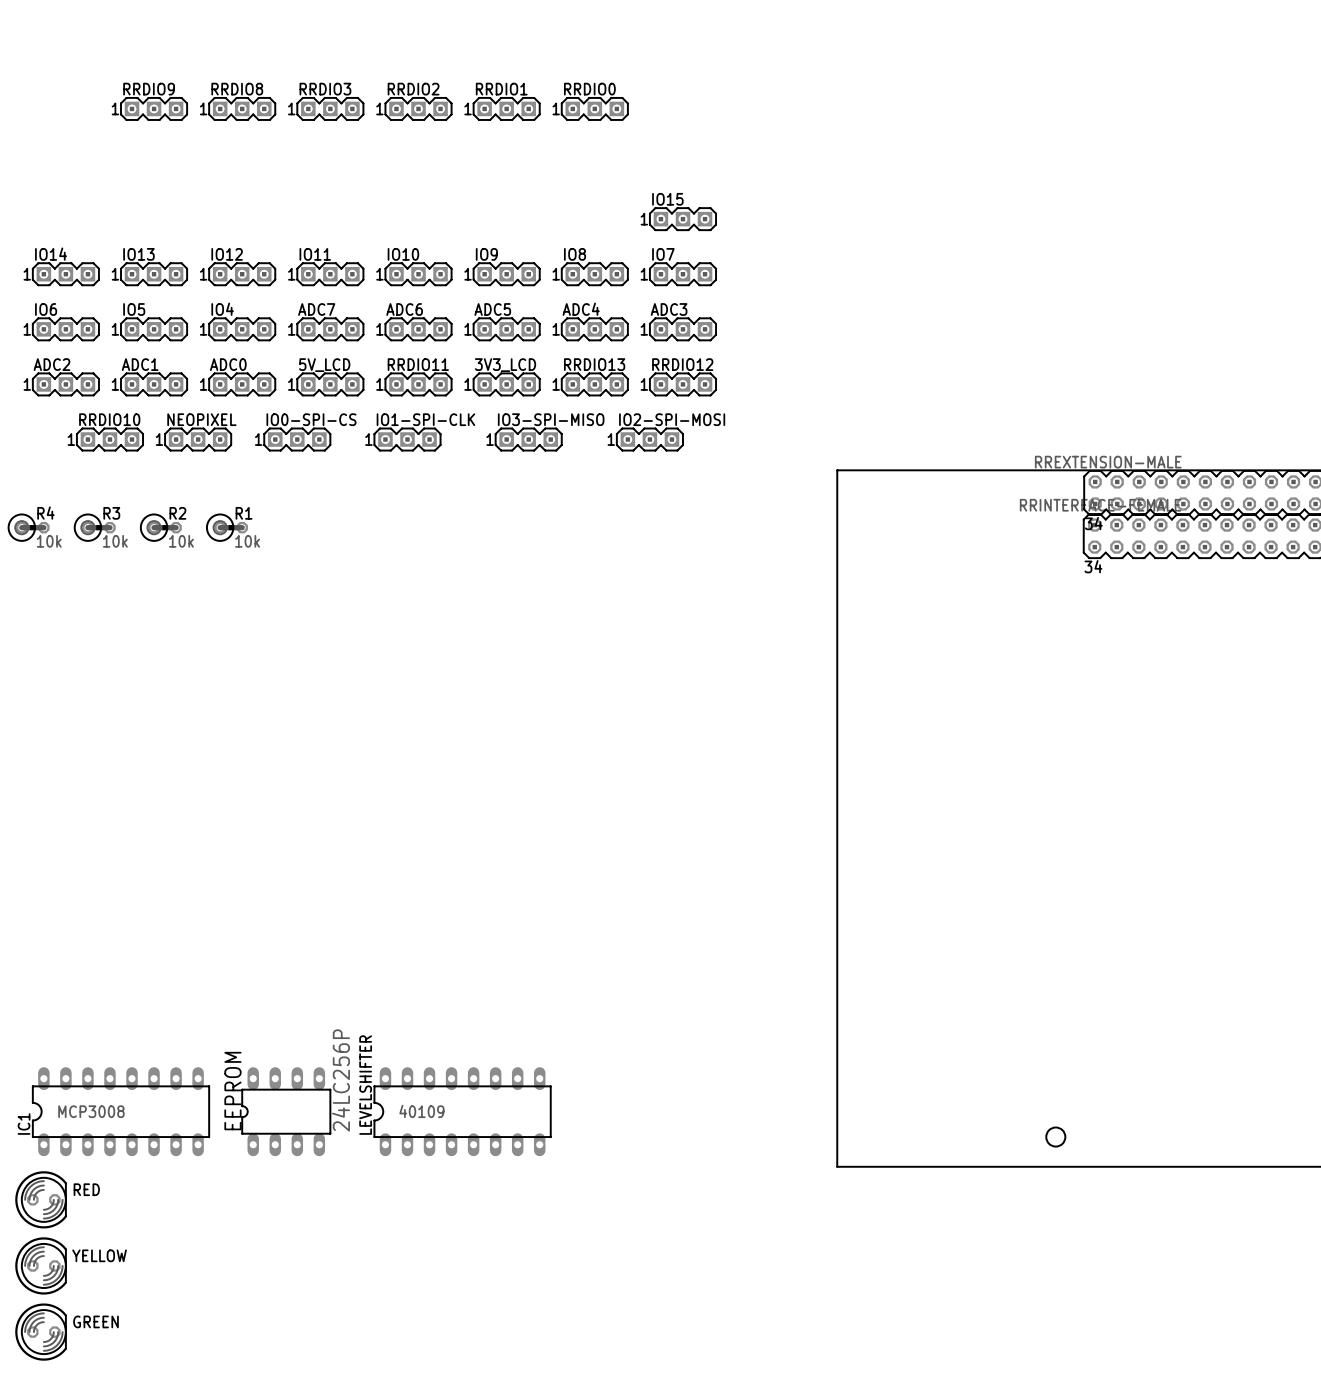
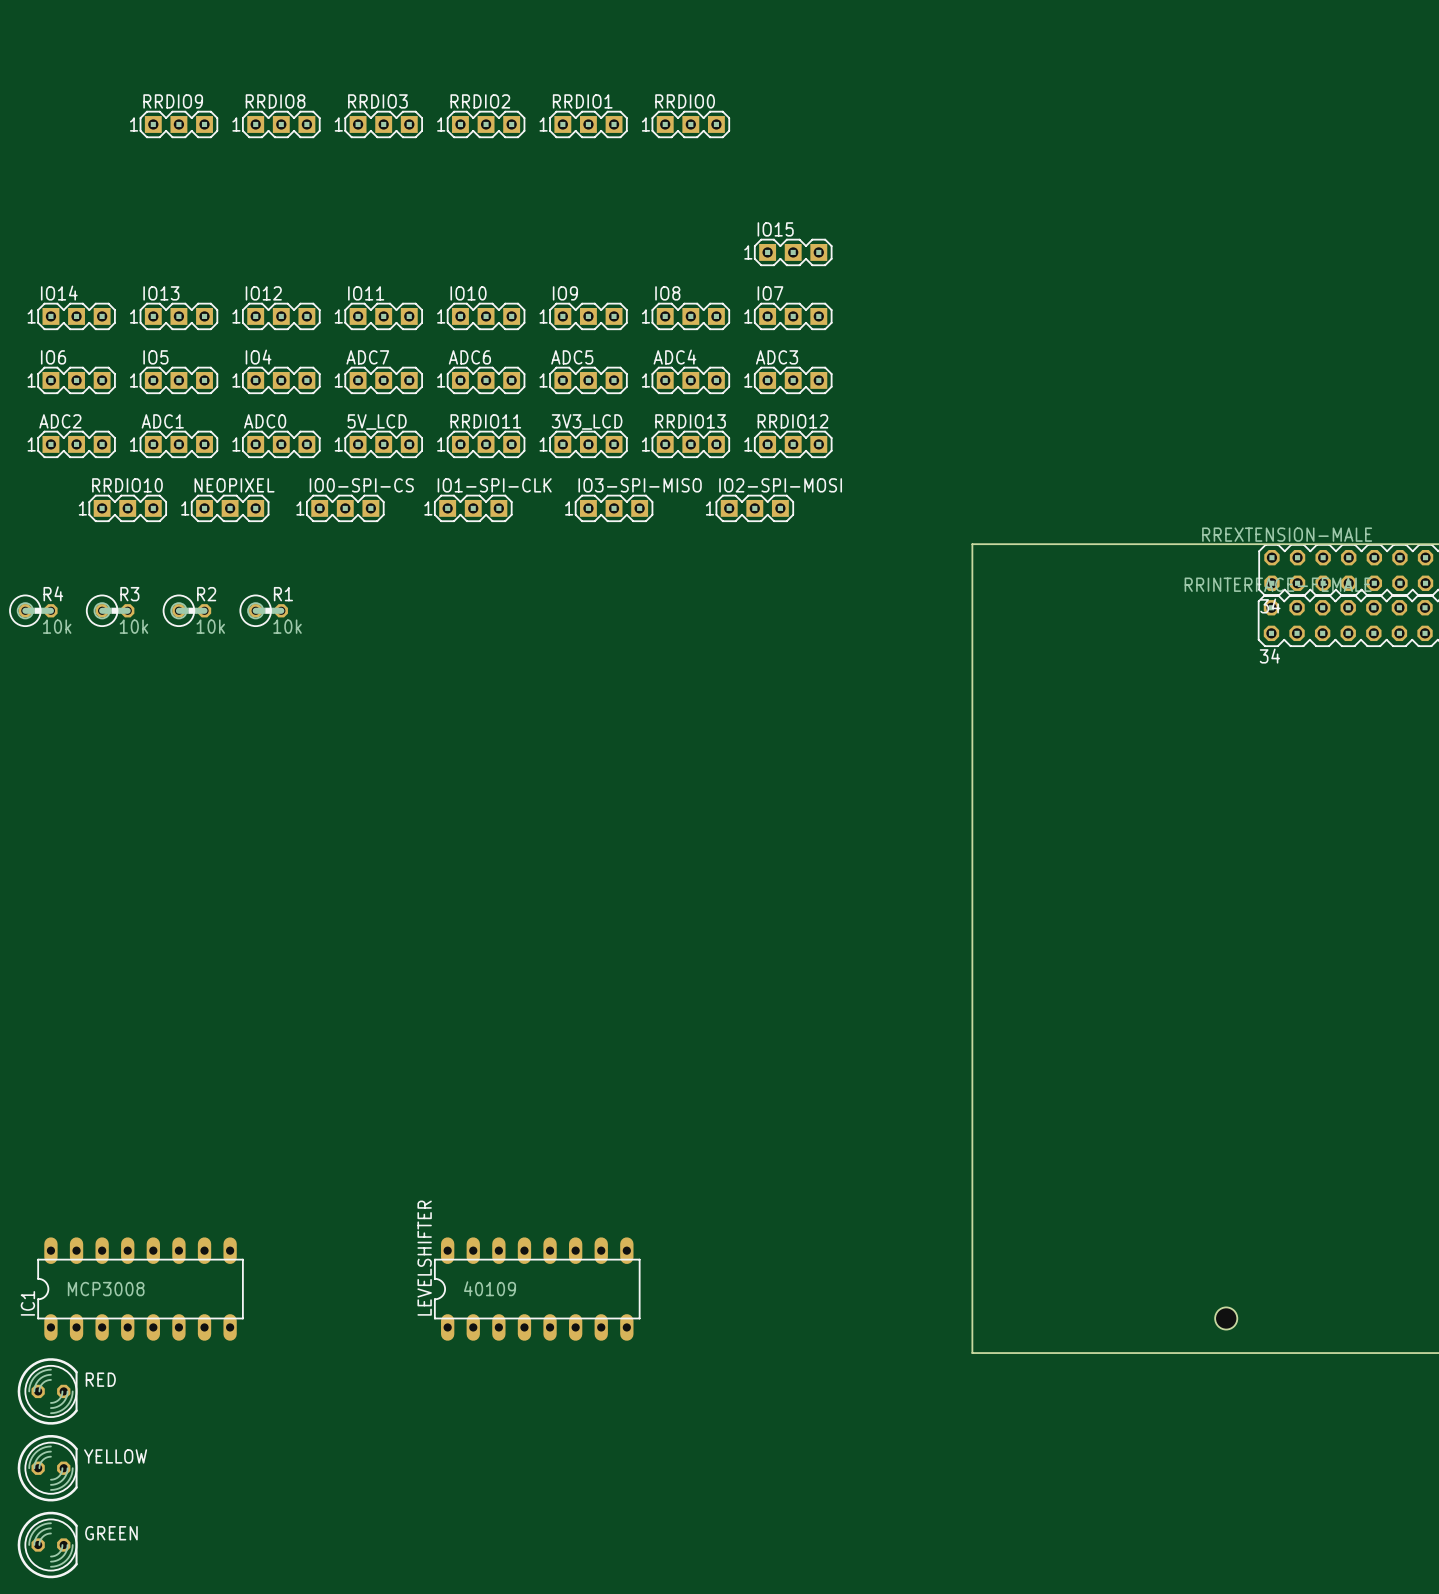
EEPROM: 24LC256P (286, 1111) -> none

